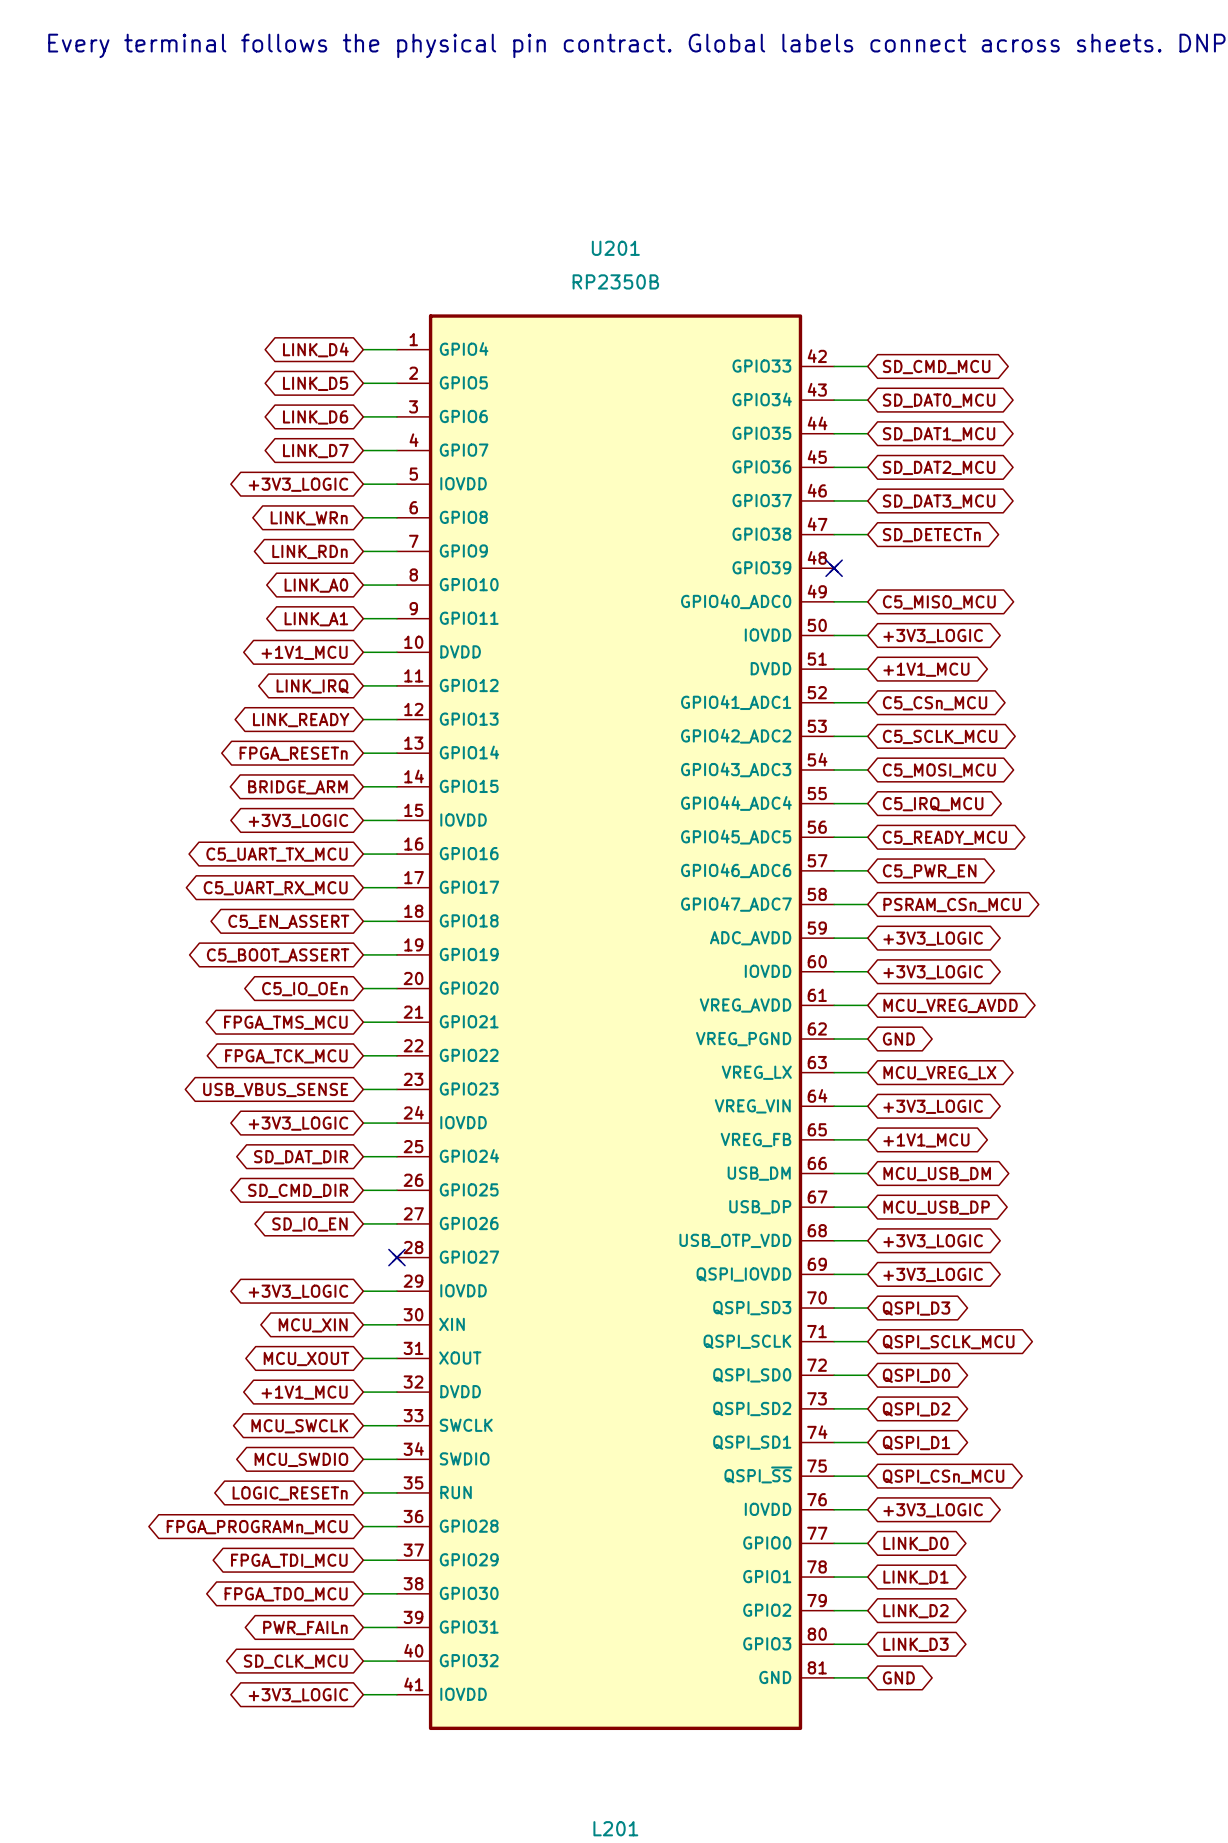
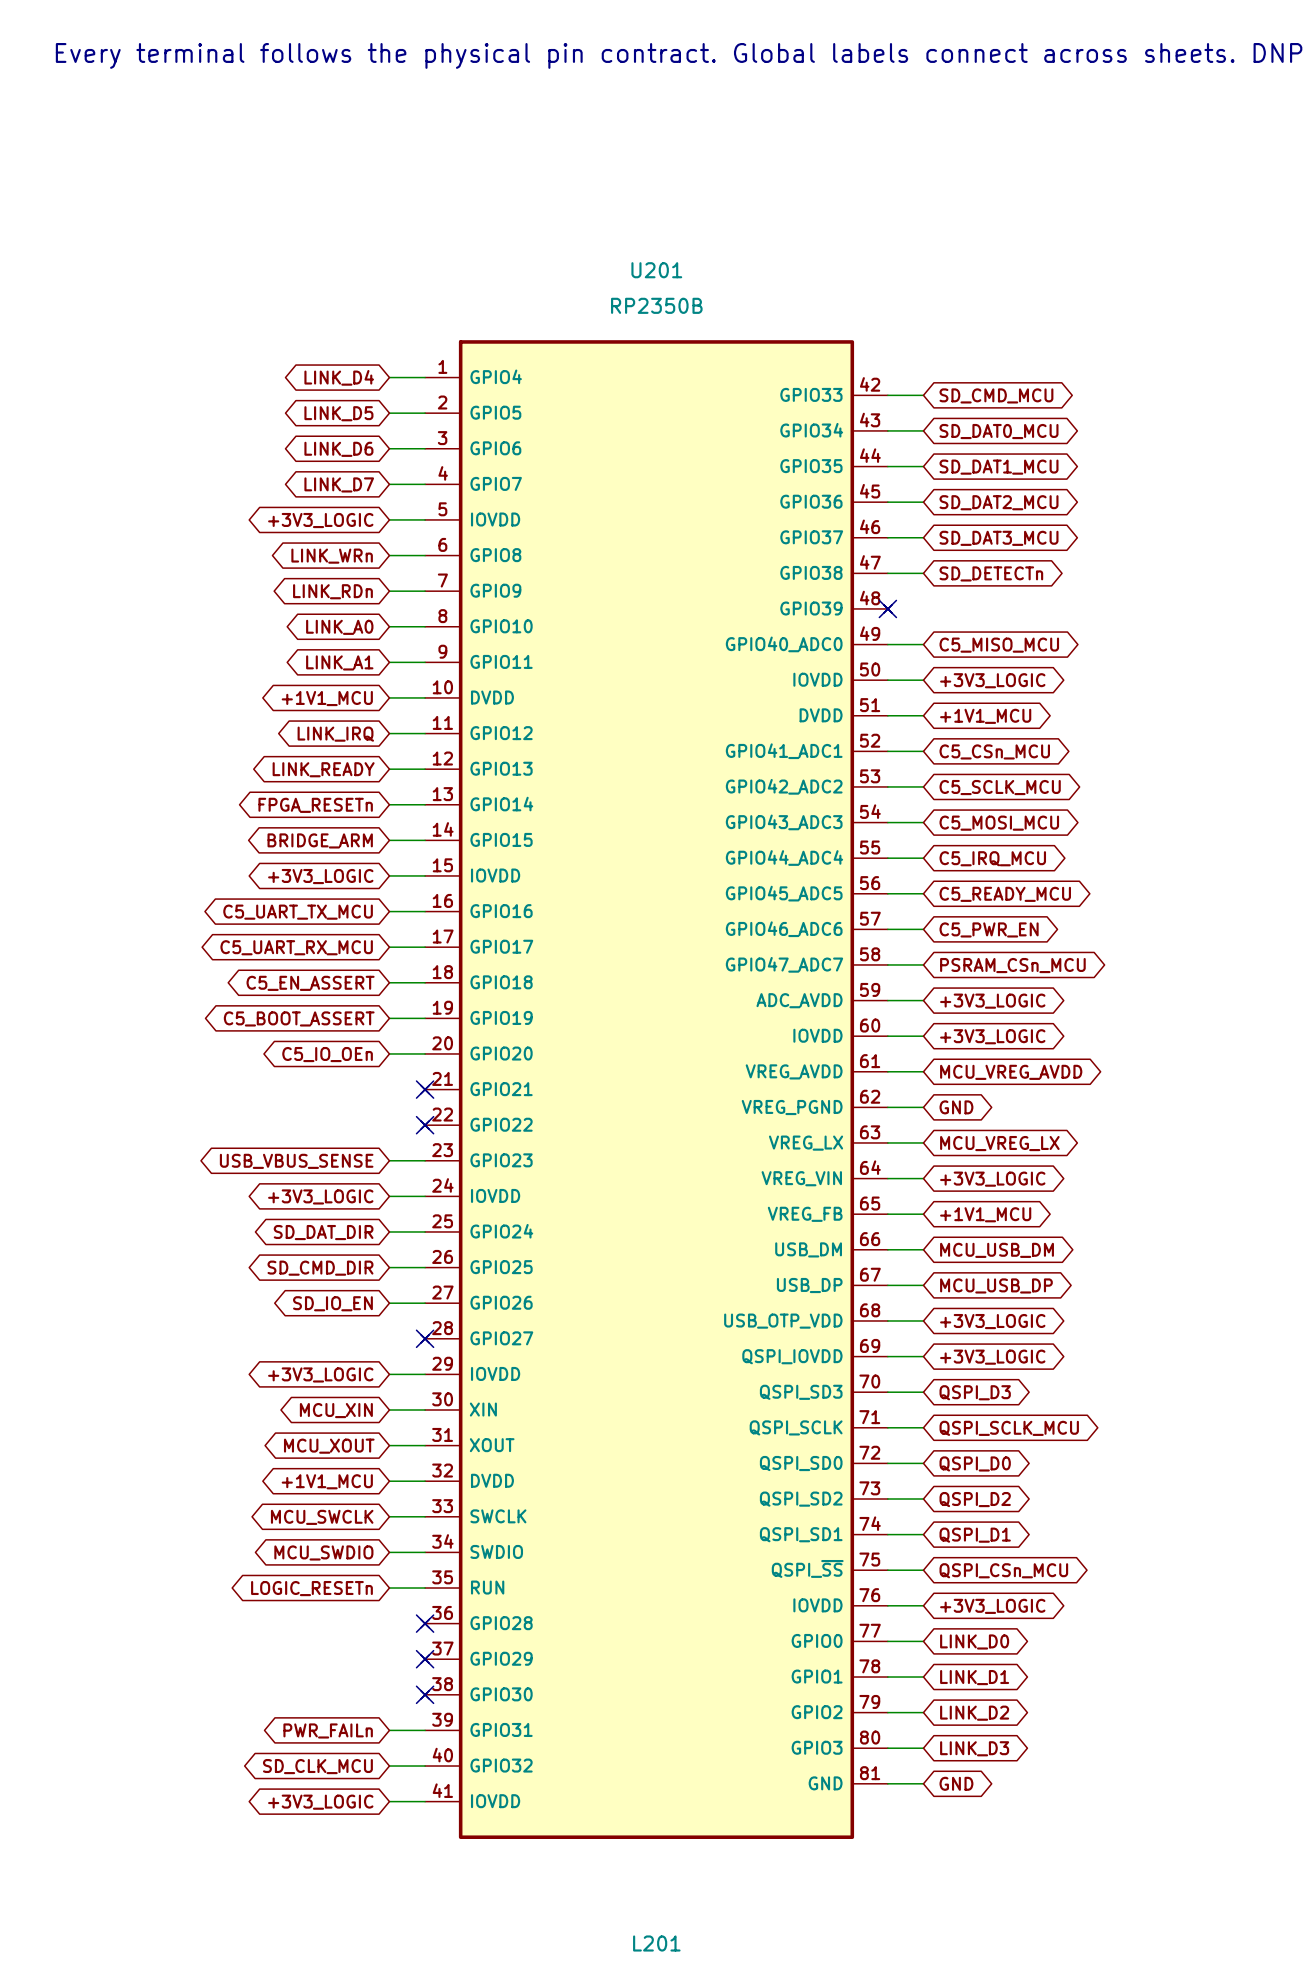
U201 symbol: [392, 314, 839, 1731] -> [420, 340, 893, 1839]
global label: FPGA_TMS_MCU (285, 1022) -> none
wire: (363, 1022) (396, 1022) -> none
no-connect mark: none -> (425, 1089)
wire: (363, 1055) (396, 1055) -> none
no-connect mark: none -> (425, 1125)
global label: FPGA_TCK_MCU (286, 1056) -> none
wire: (363, 1526) (396, 1526) -> none
no-connect mark: none -> (425, 1623)
global label: FPGA_PROGRAMn_MCU (257, 1527) -> none
global label: FPGA_TDI_MCU (289, 1560) -> none
wire: (363, 1560) (396, 1560) -> none
no-connect mark: none -> (425, 1659)
wire: (363, 1593) (396, 1593) -> none
no-connect mark: none -> (425, 1694)
global label: FPGA_TDO_MCU (286, 1594) -> none

